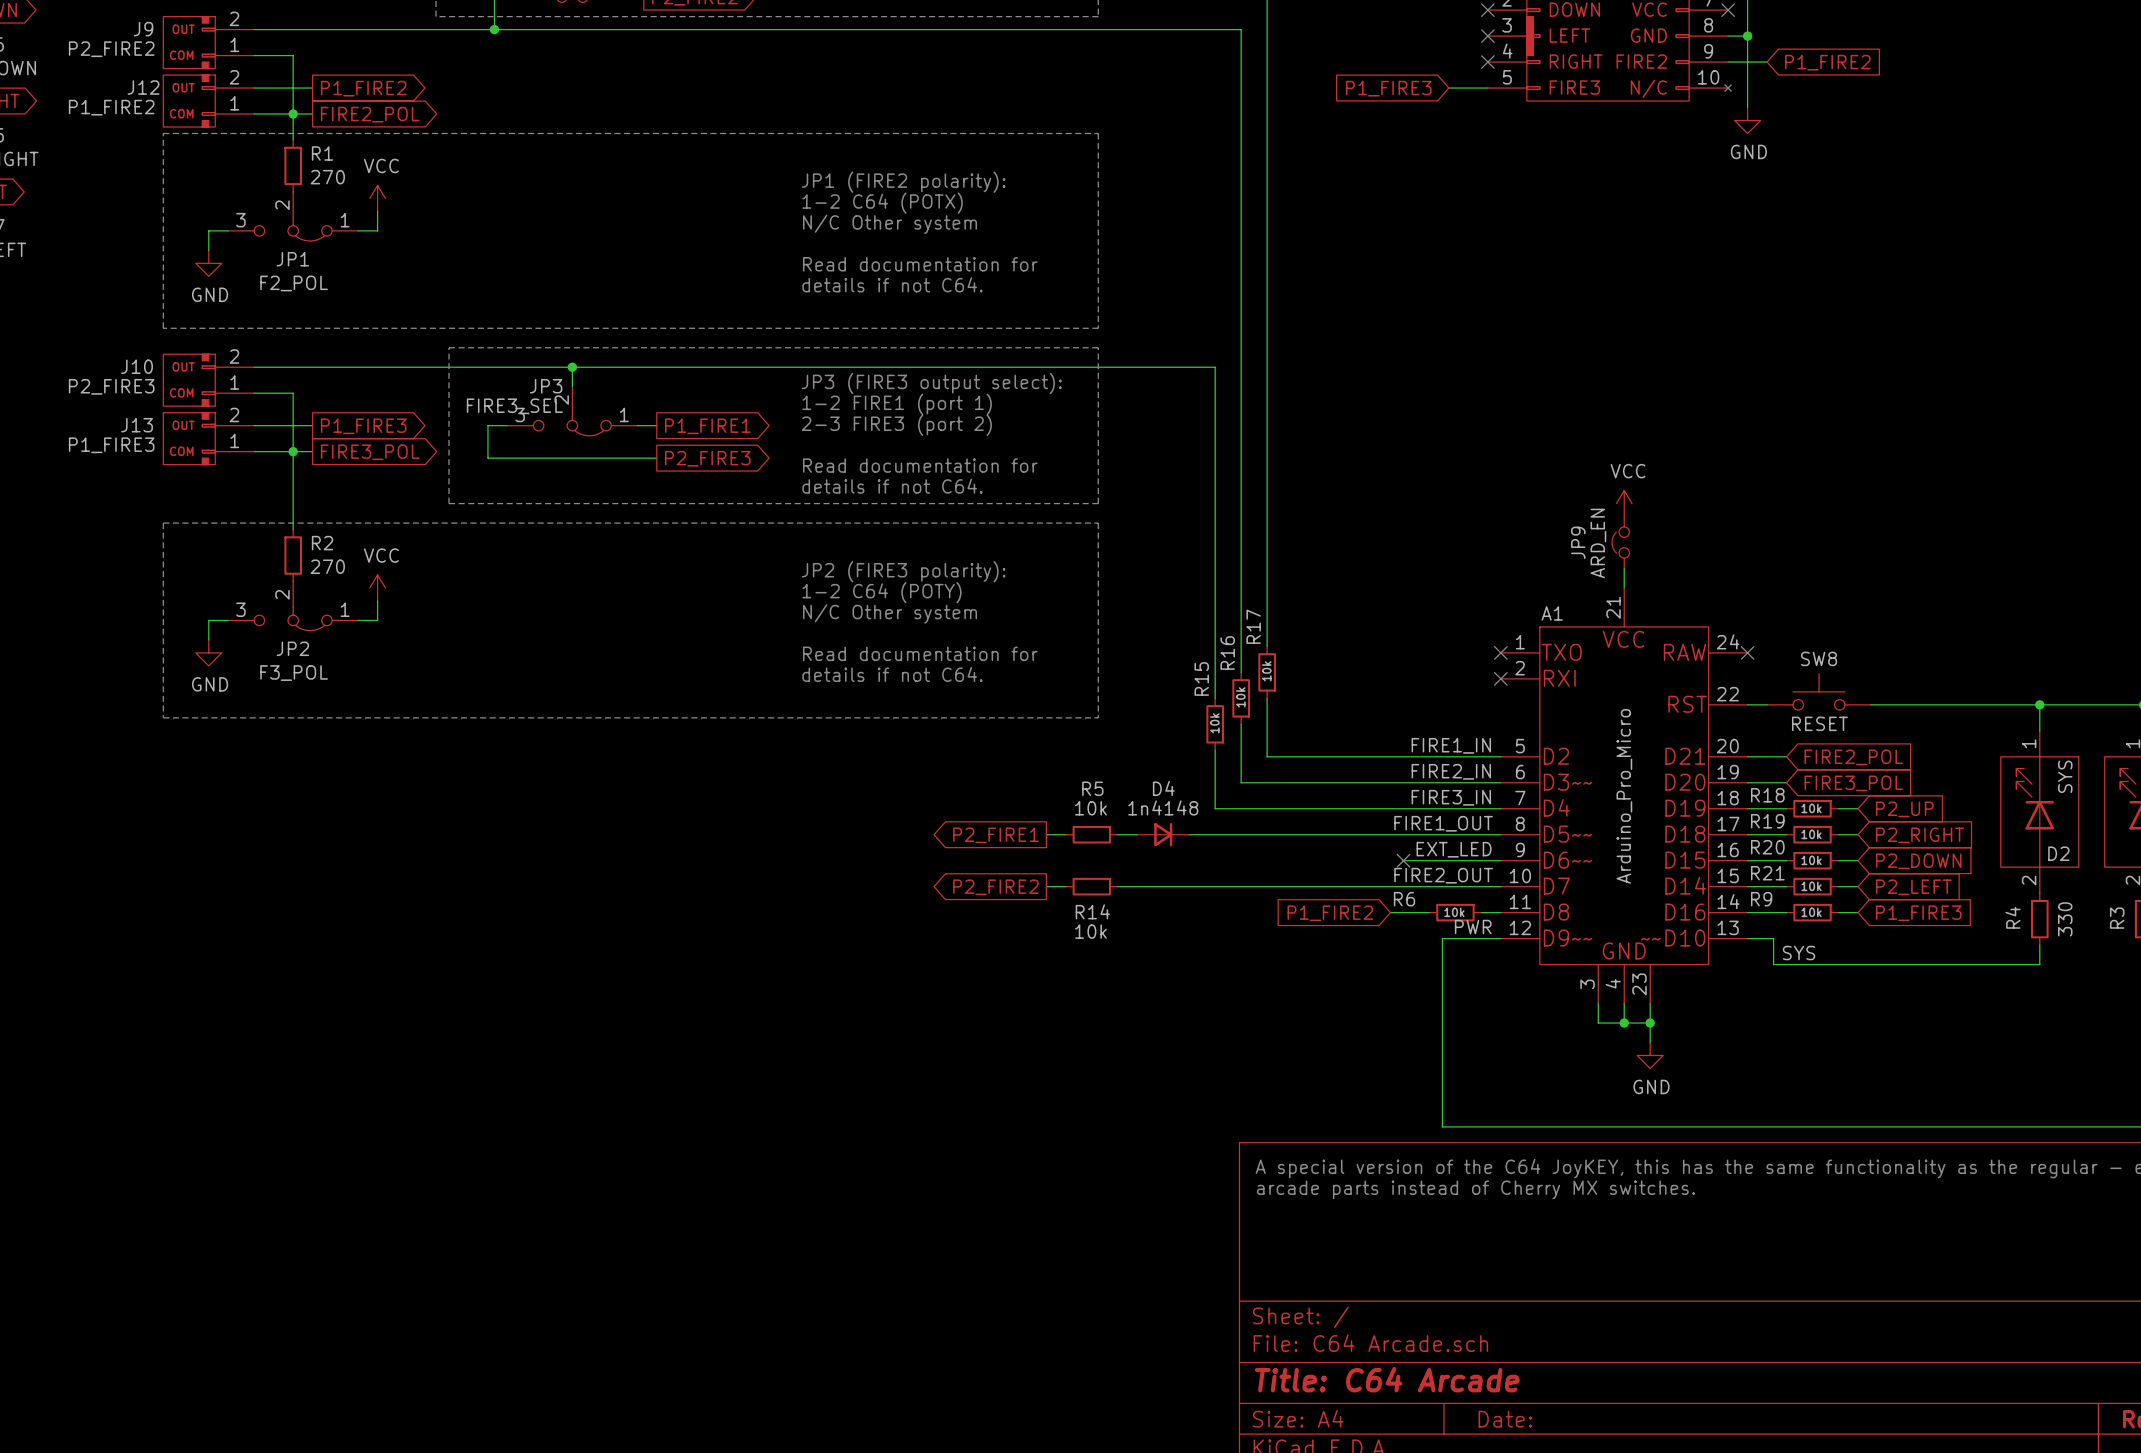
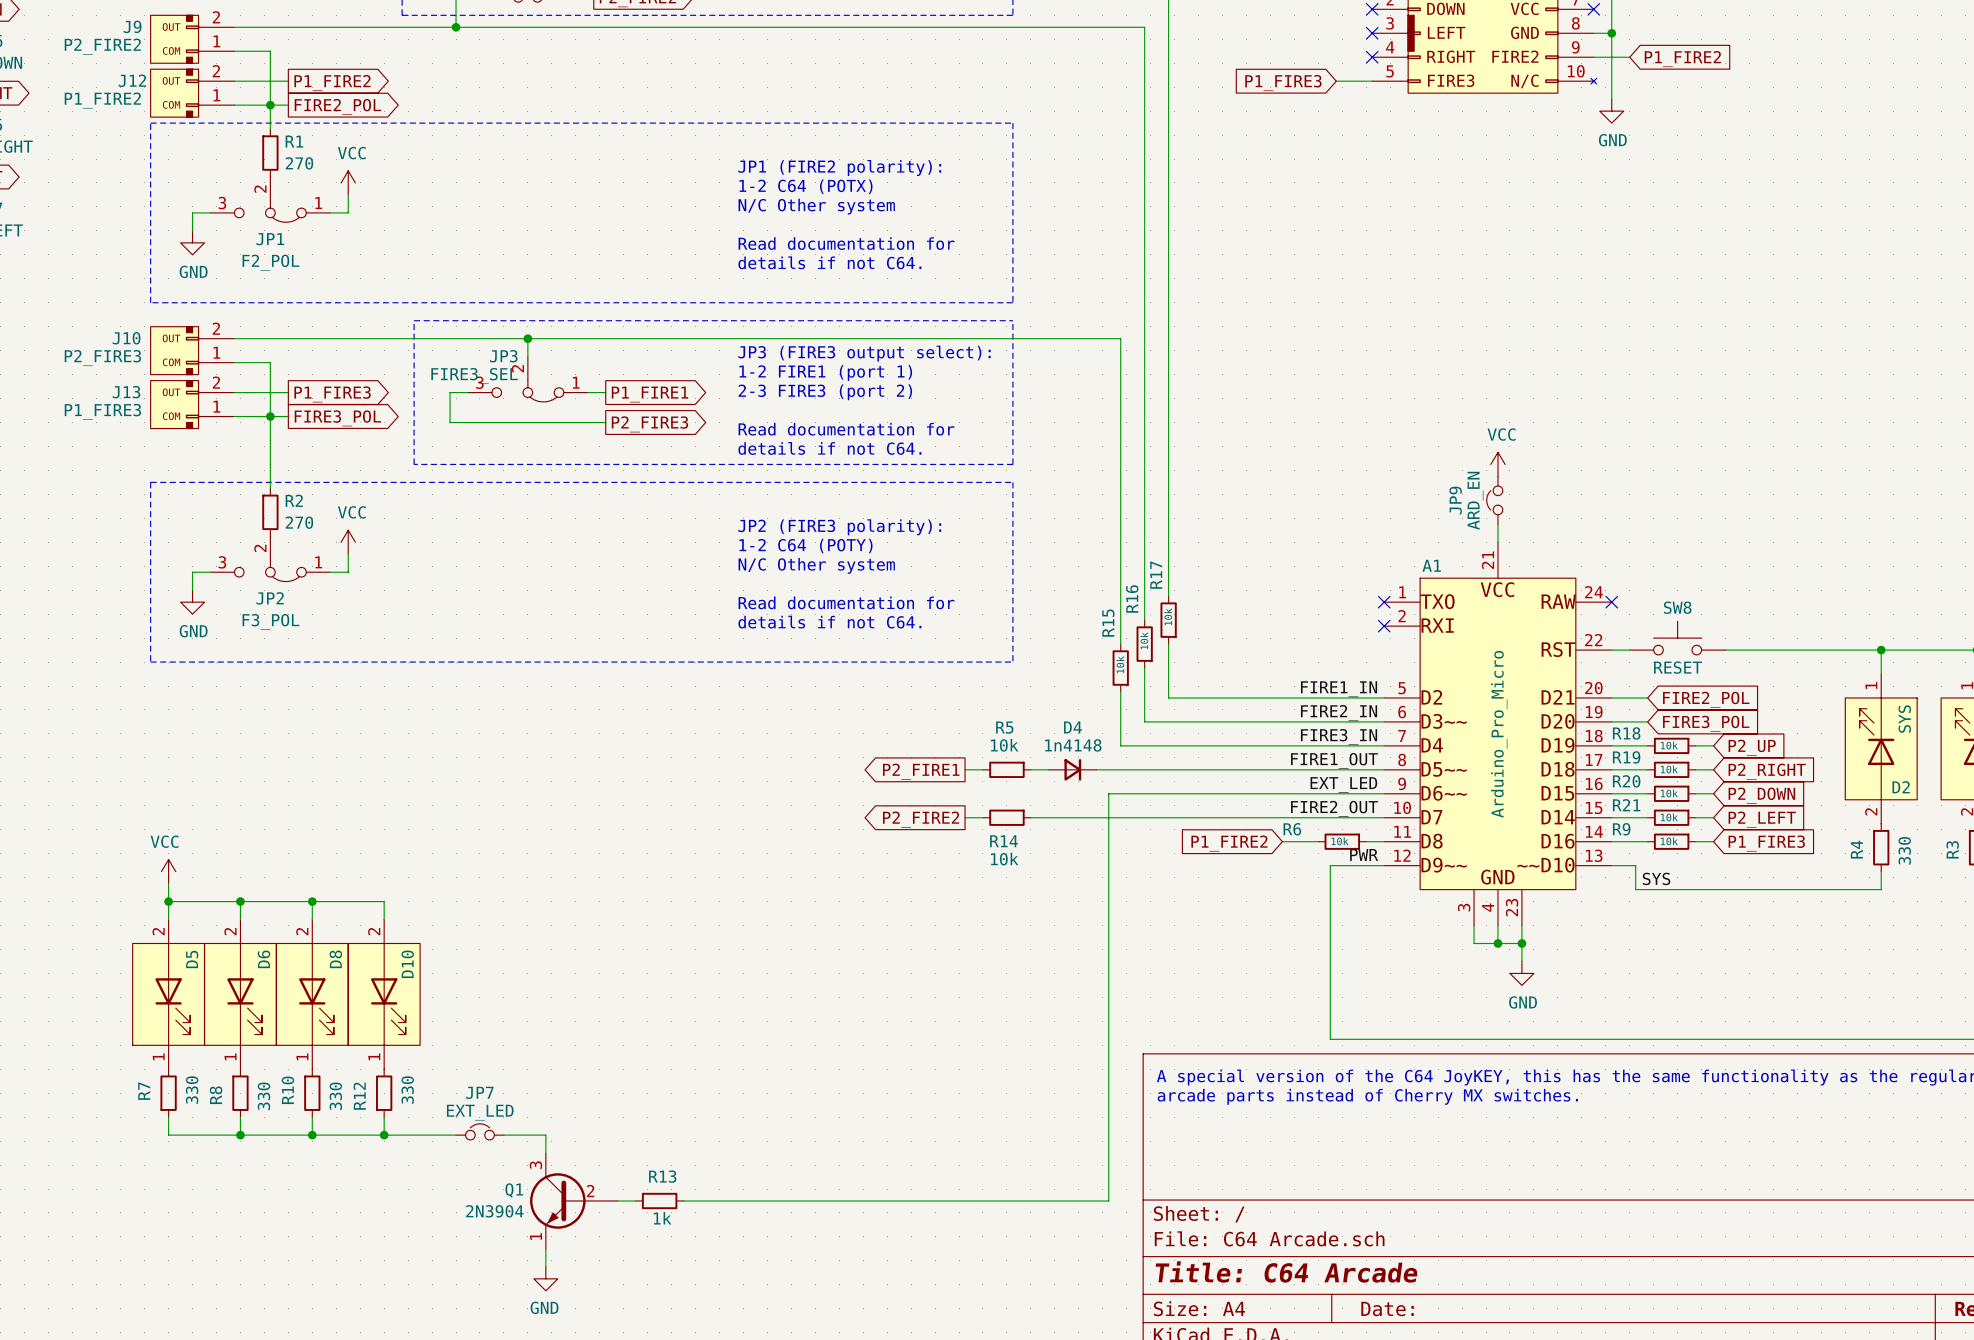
wire: none -> (1294, 793) (1108, 793) (1108, 1200) (683, 1200)
no-connect mark: (1403, 860) -> none
power symbol: none -> VCC (168, 871)
wire: none -> (168, 883) (168, 919)
wire: none -> (168, 901) (384, 901) (384, 919)
junction: none -> (168, 901)
wire: none -> (240, 901) (240, 919)
junction: none -> (240, 901)
wire: none -> (312, 901) (312, 919)
junction: none -> (312, 901)
D5: none -> (168, 994)
D6: none -> (240, 994)
D8: none -> (312, 994)
D10: none -> (384, 994)
R7: none -> 330 (168, 1093)
R8: none -> 330 (240, 1093)
R10: none -> 330 (312, 1093)
R12: none -> 330 (384, 1093)
wire: none -> (168, 1117) (168, 1135) (456, 1135)
wire: none -> (240, 1117) (240, 1135)
wire: none -> (312, 1117) (312, 1135)
wire: none -> (384, 1117) (384, 1135)
JP7: none -> EXT_LED (479, 1131)
junction: none -> (240, 1135)
junction: none -> (312, 1135)
junction: none -> (384, 1135)
wire: none -> (503, 1135) (545, 1135) (545, 1153)
Q1: none -> 2N3904 (573, 1200)
wire: none -> (617, 1200) (635, 1200)
R13: none -> 1k (659, 1200)
wire: none -> (545, 1248) (545, 1266)
power symbol: none -> GND (545, 1278)

